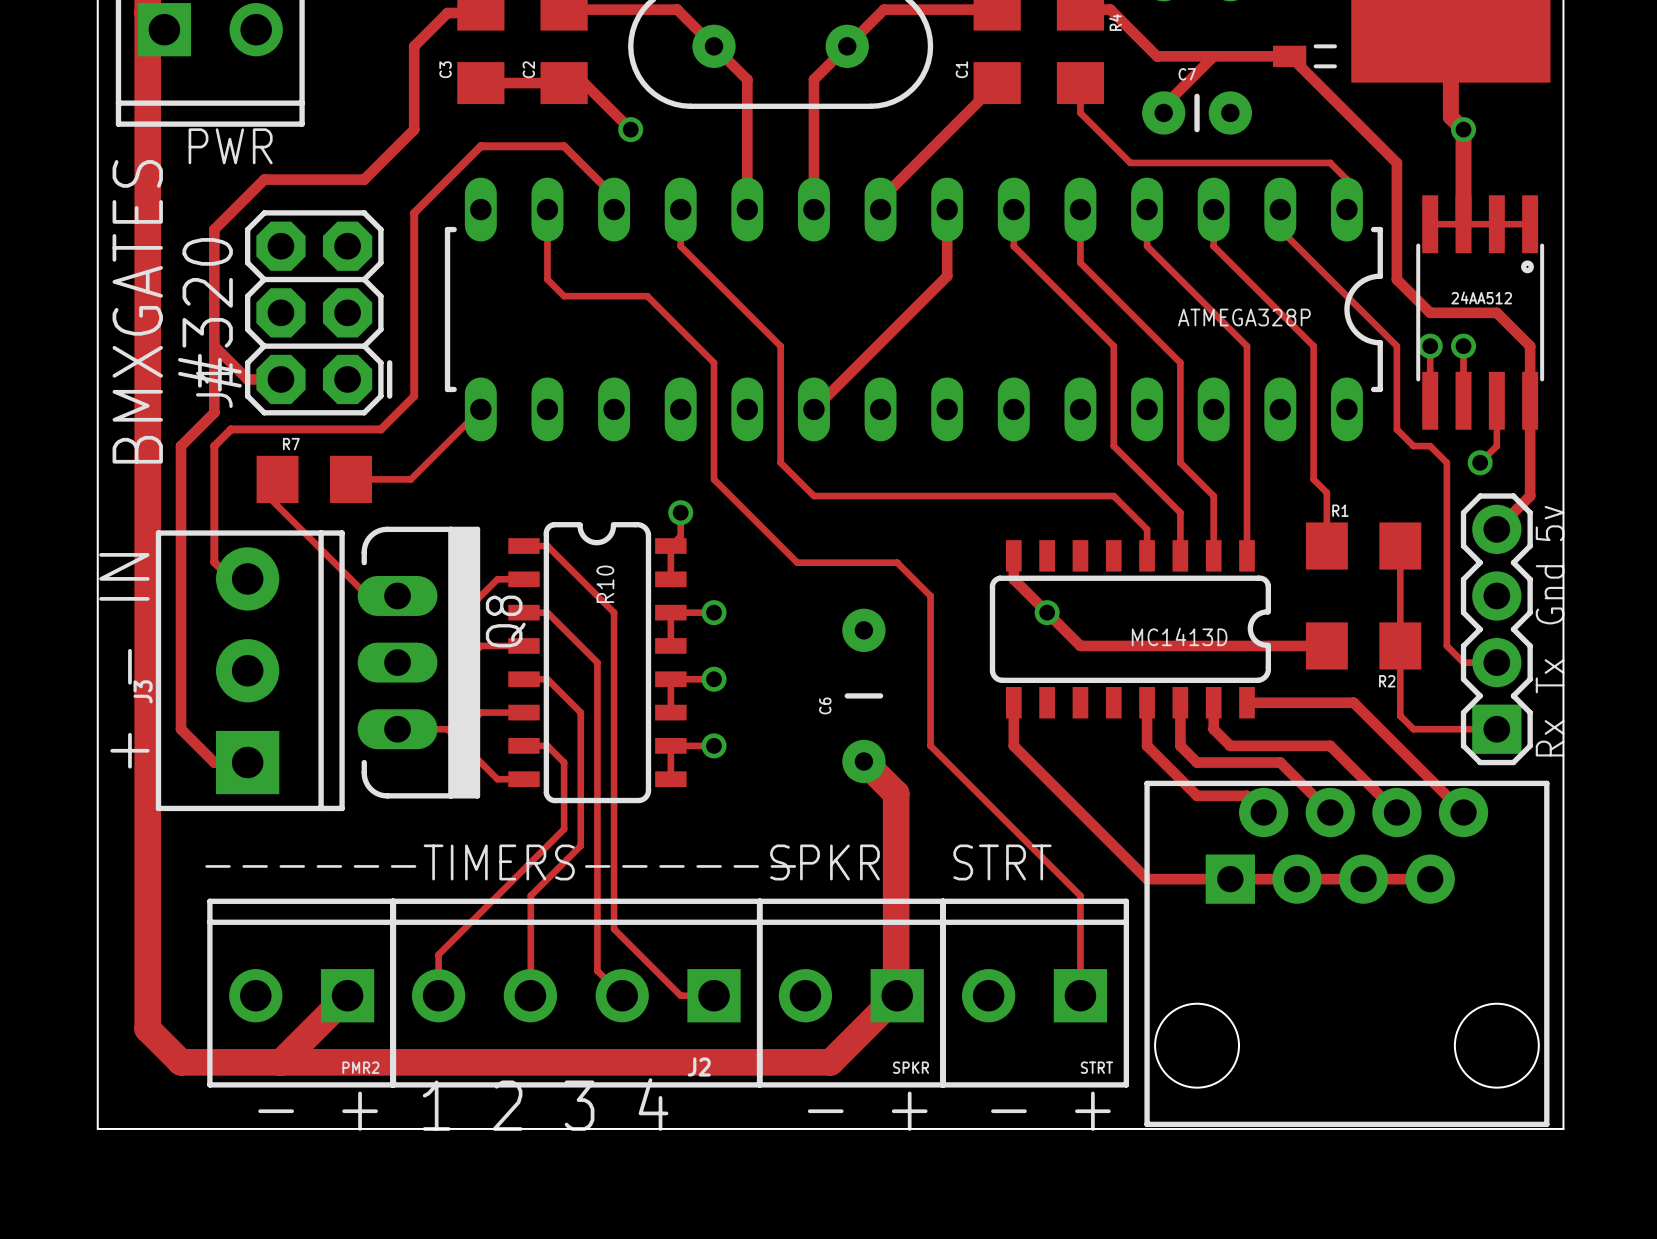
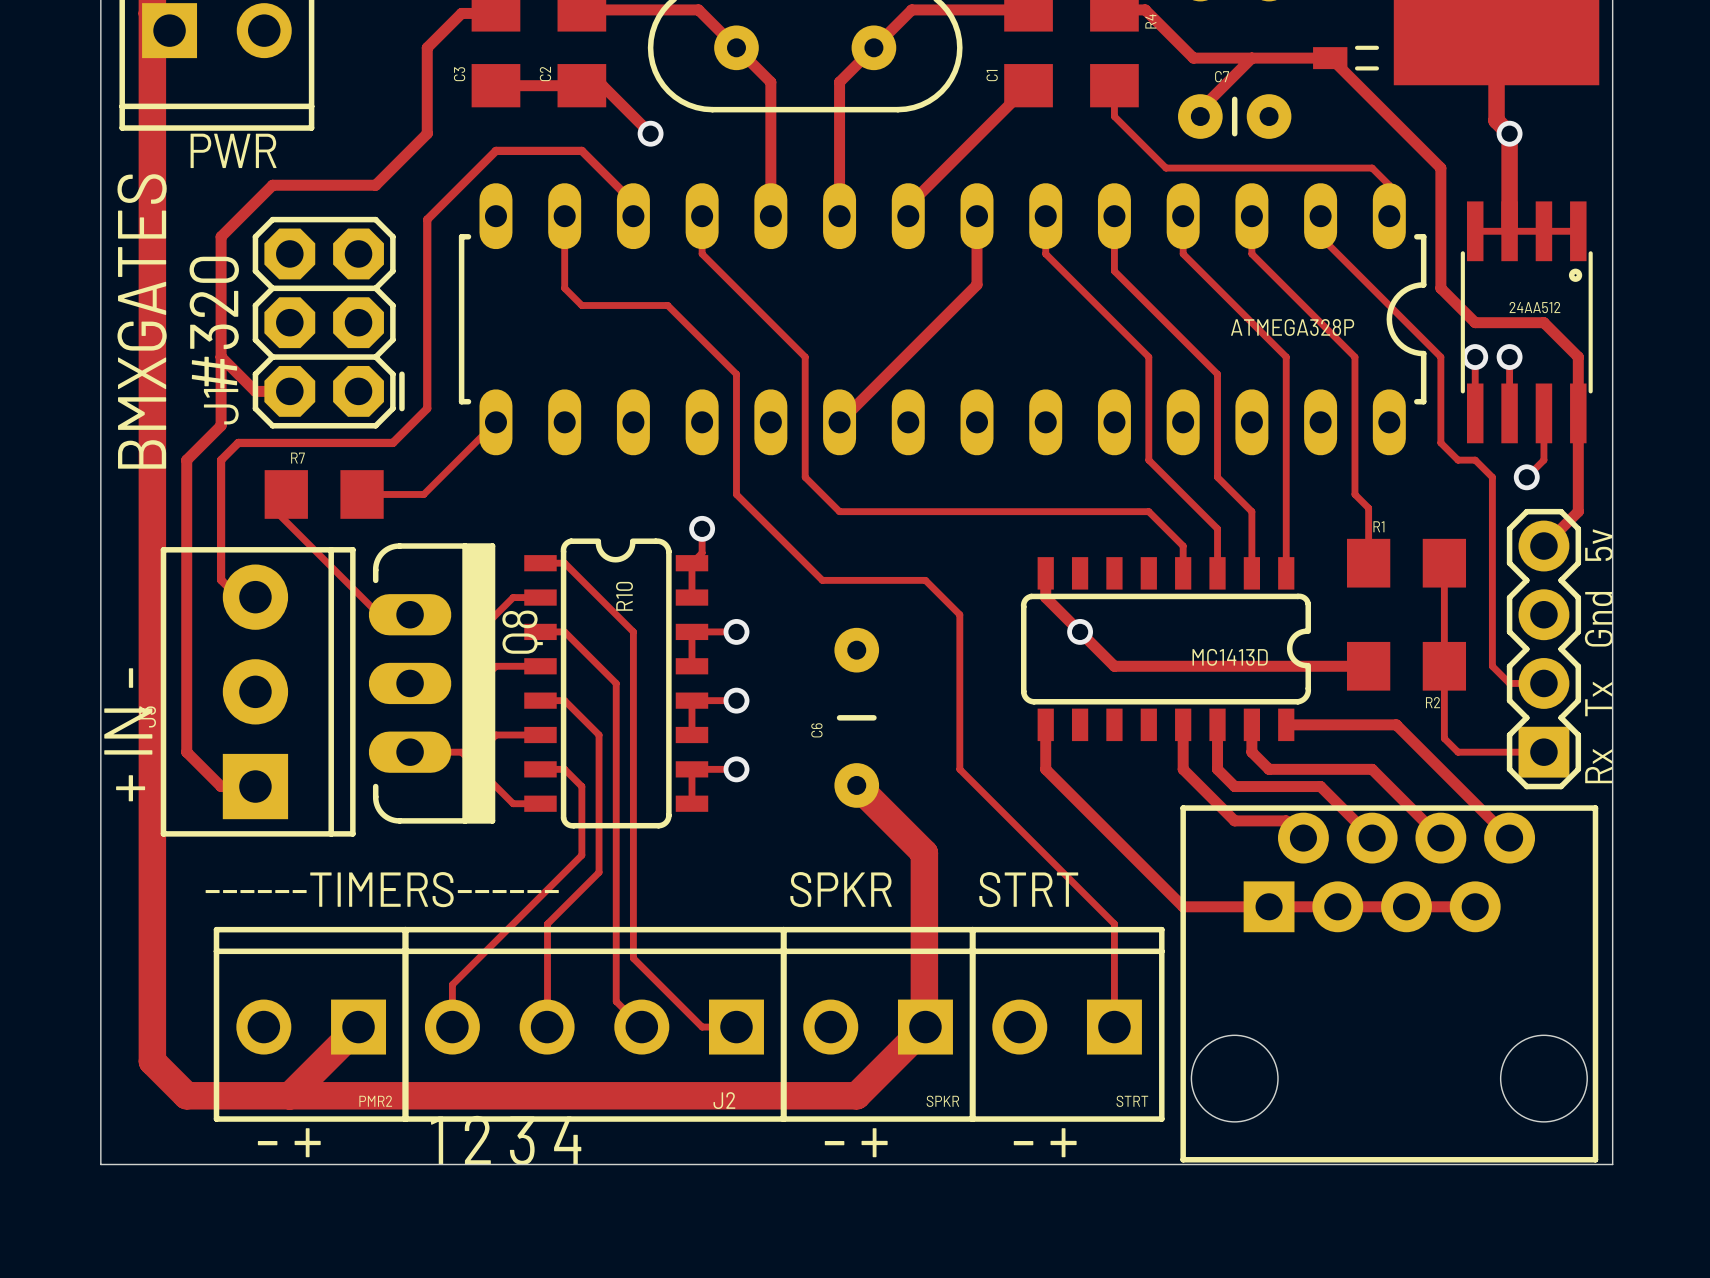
text: + - IN (124, 660) -> + IN - (128, 734)
C6 position: (863, 695) -> (856, 717)
track: (863, 761) (896, 793) (896, 827) -> (856, 785) (924, 853)

